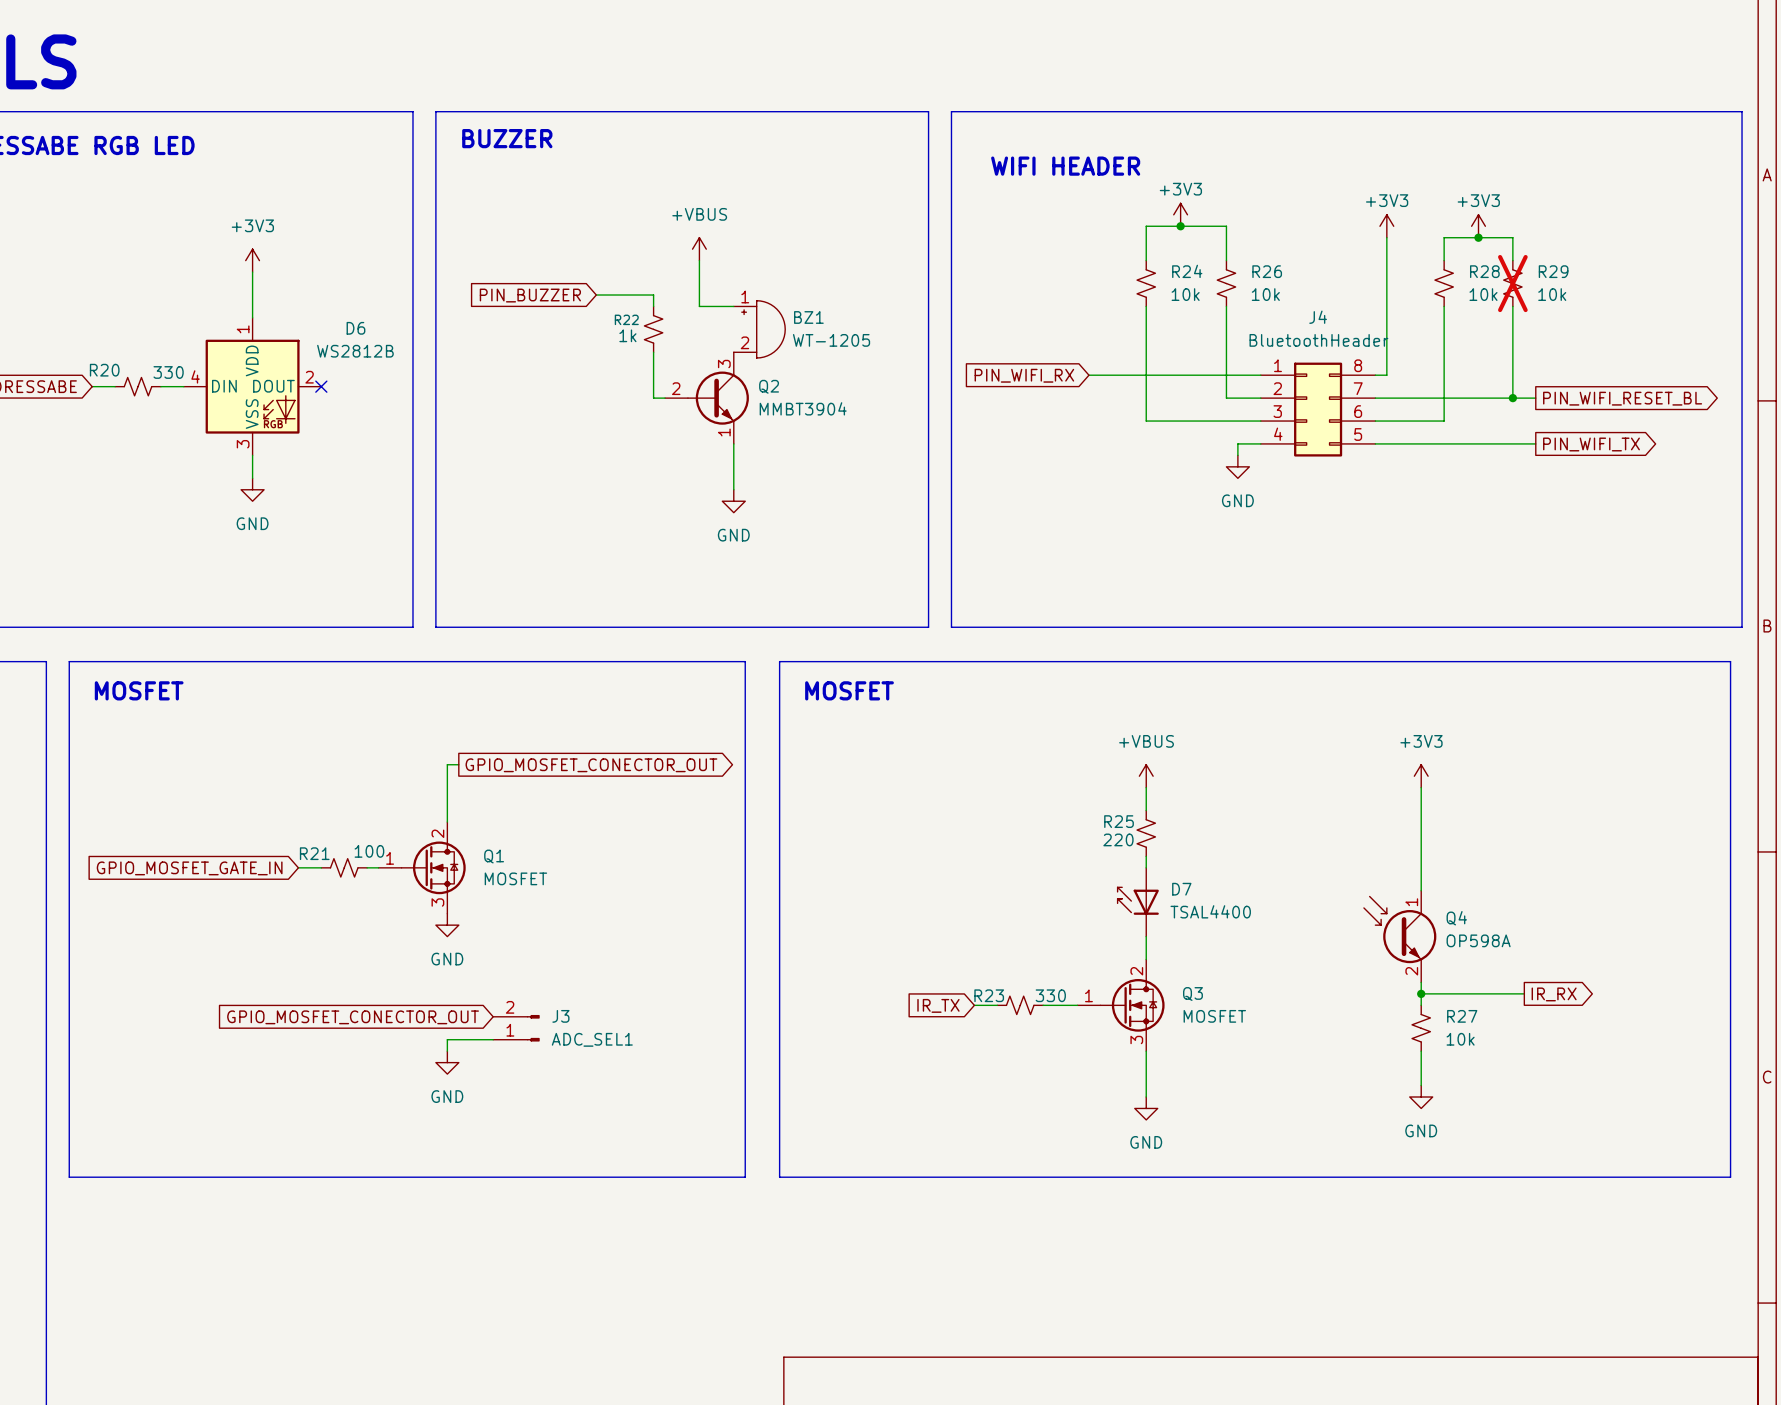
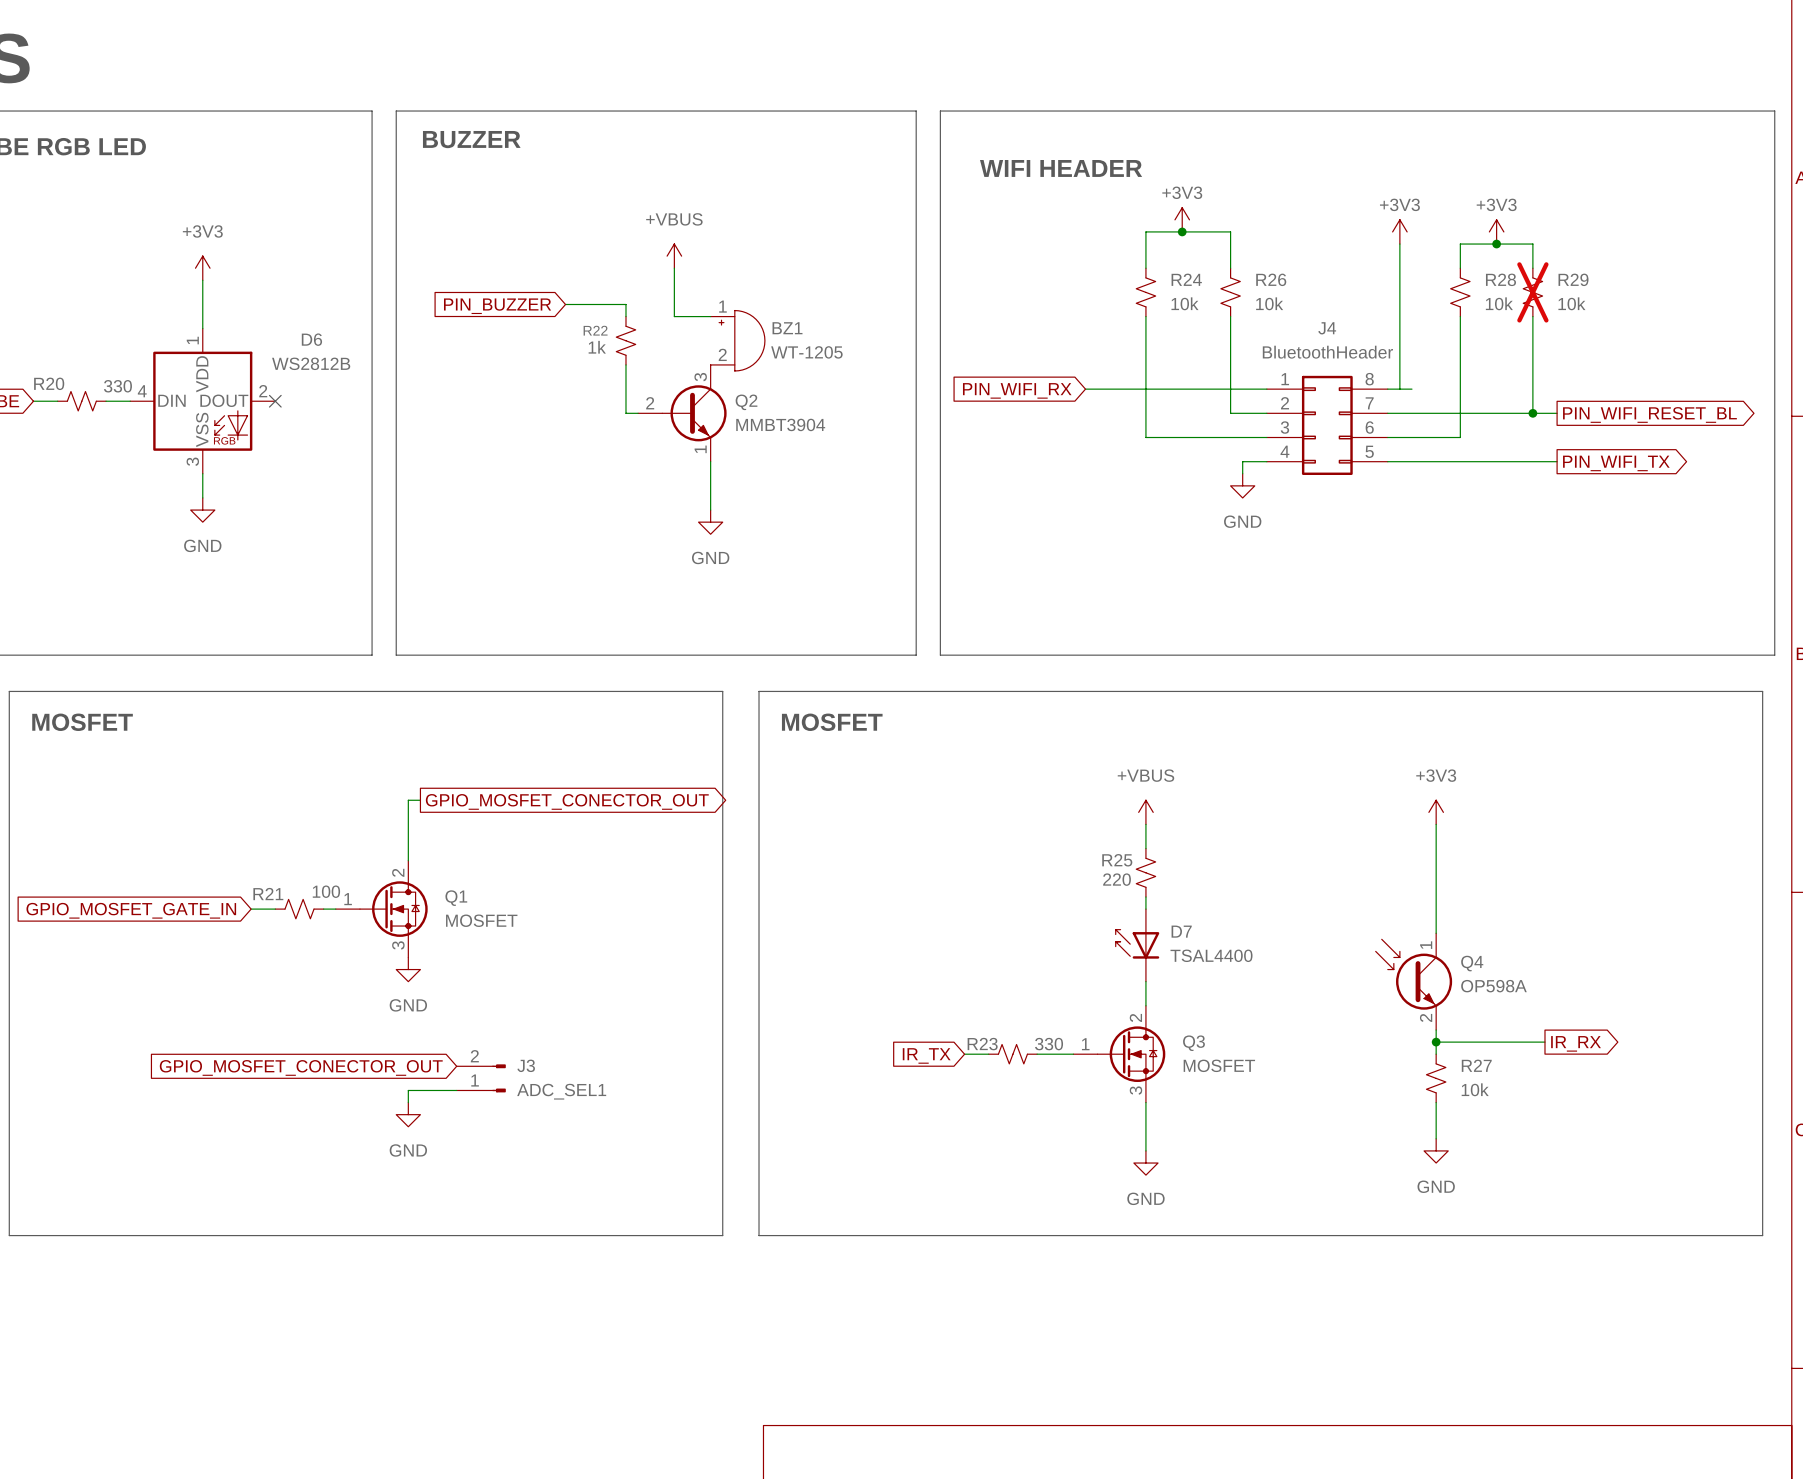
wire: none -> (1399, 389) (1411, 389)

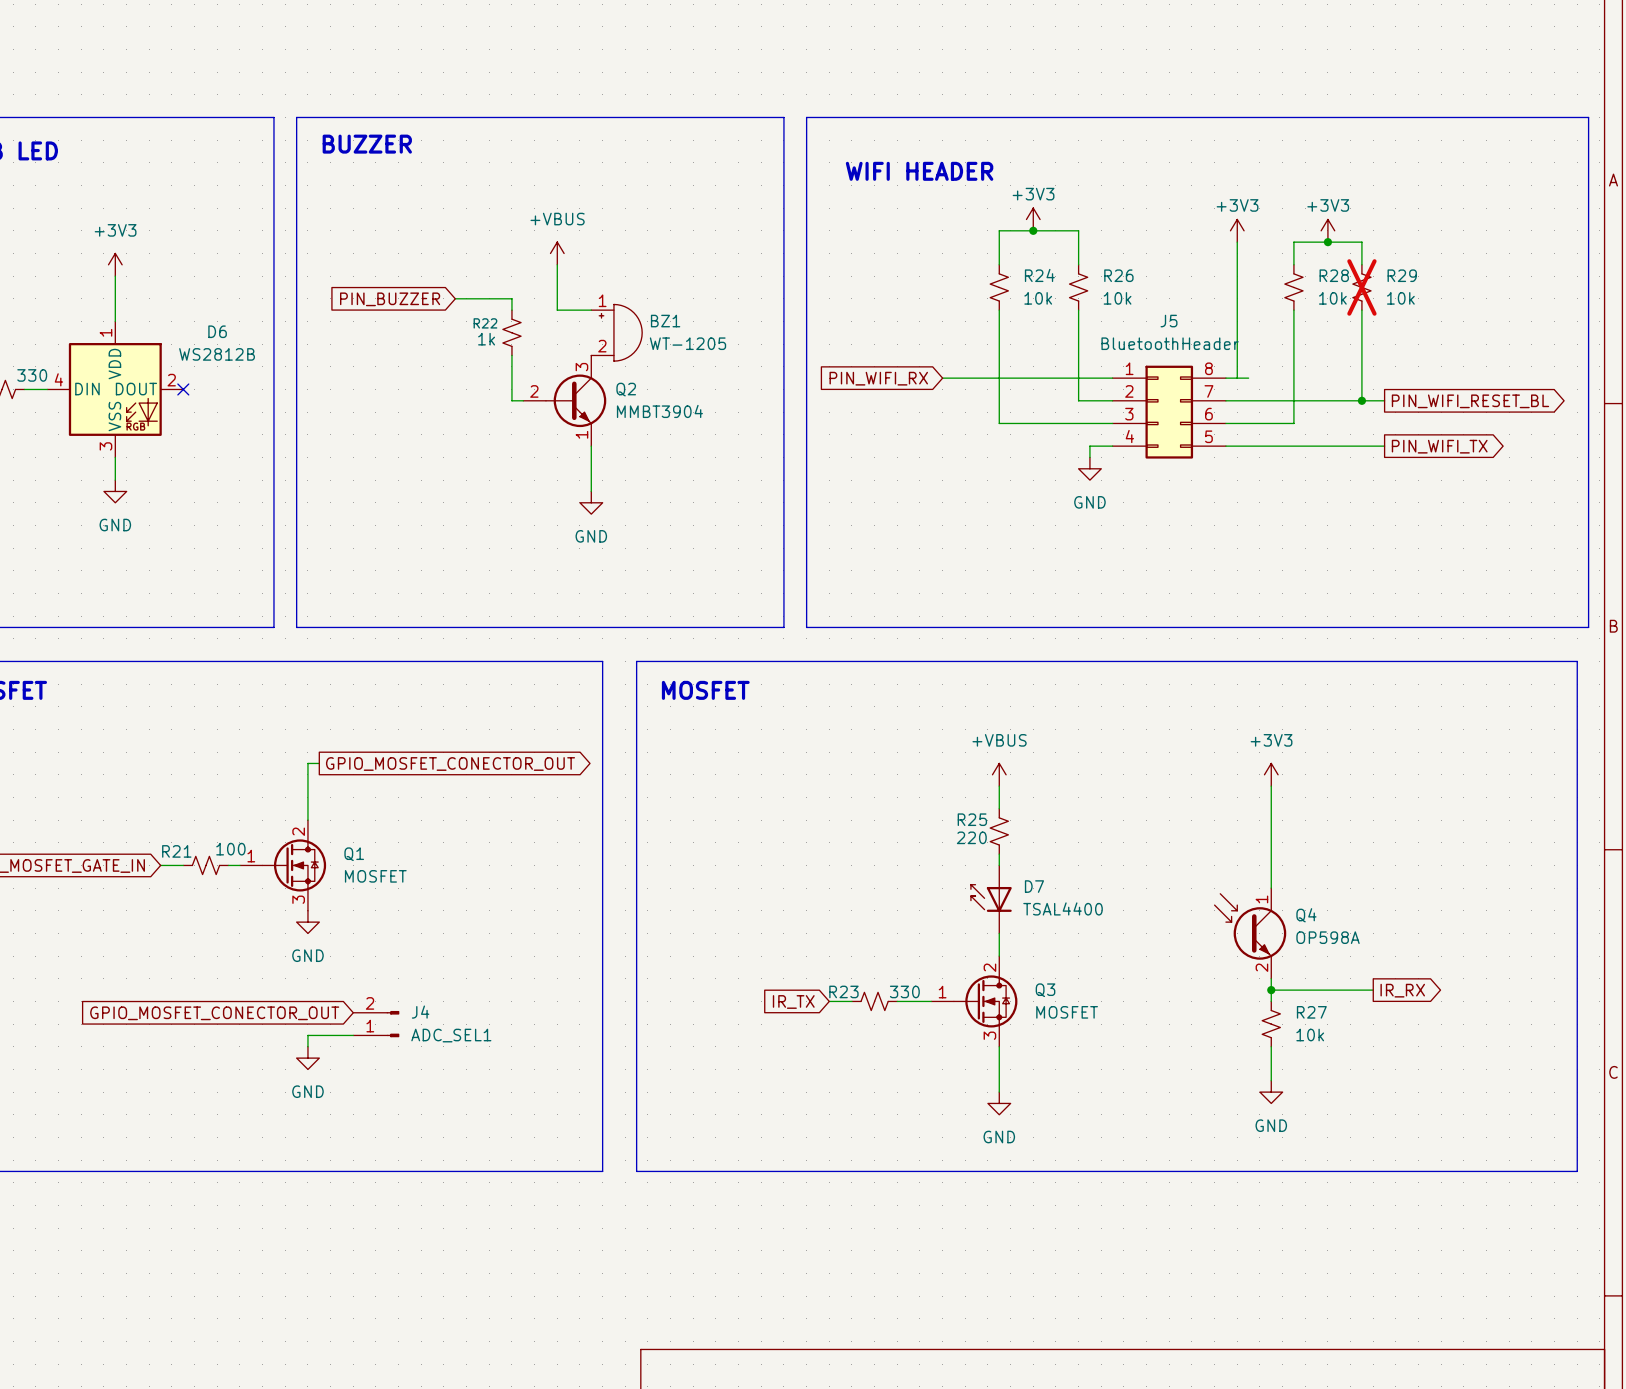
J4 name: J4 (1327, 328) -> J5 (1169, 321)
J3 name: J3 (526, 1065) -> J4 (420, 1012)

